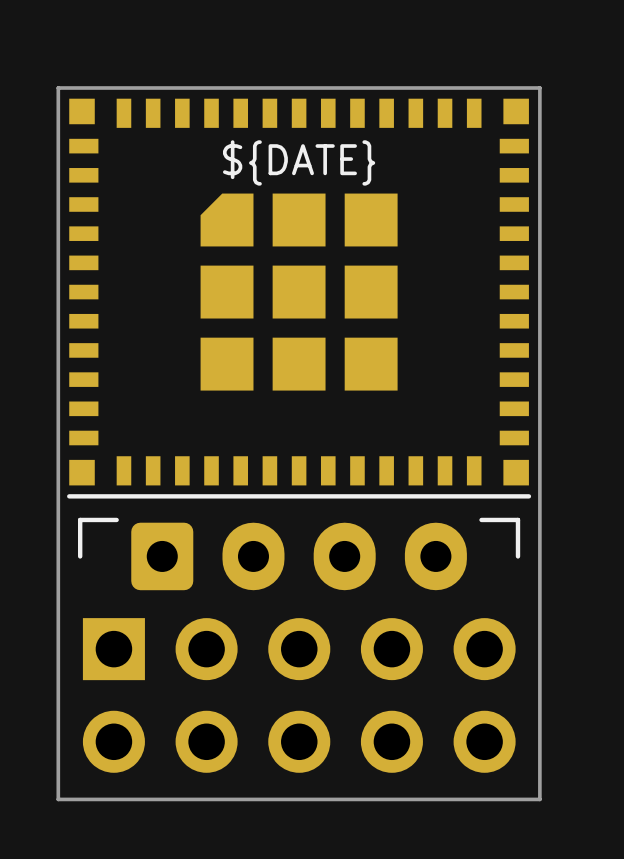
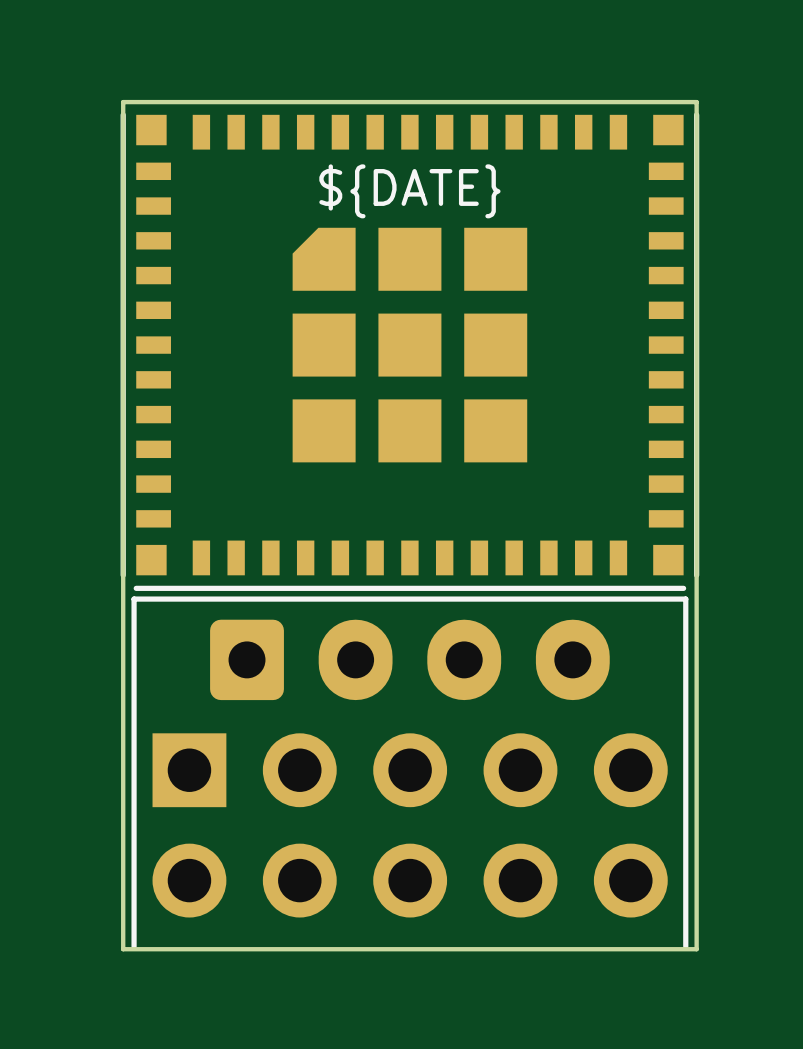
part footprint: [67, 98, 532, 499] -> [120, 112, 700, 591]
part: (299, 553) -> none
part: none -> (409, 772)

